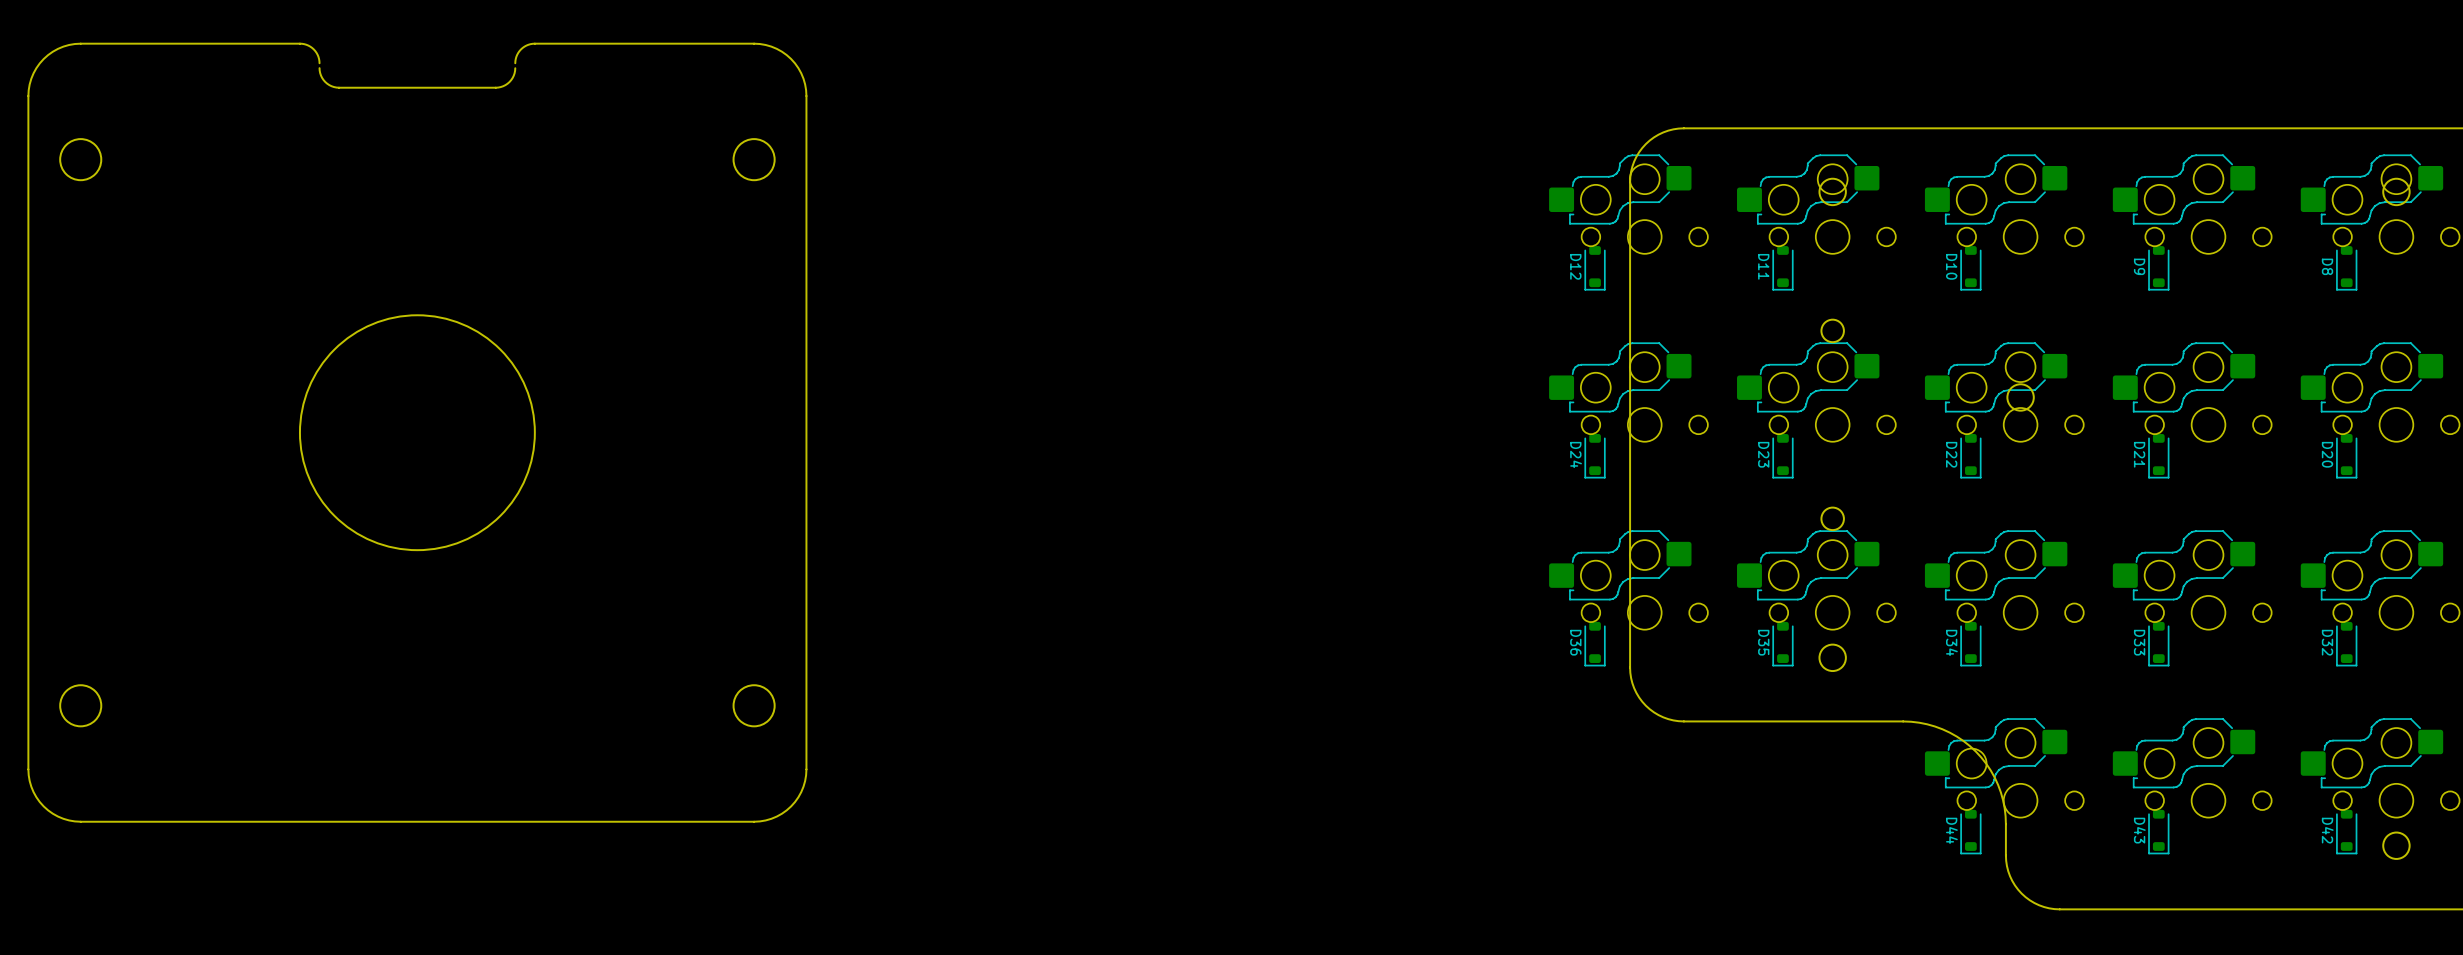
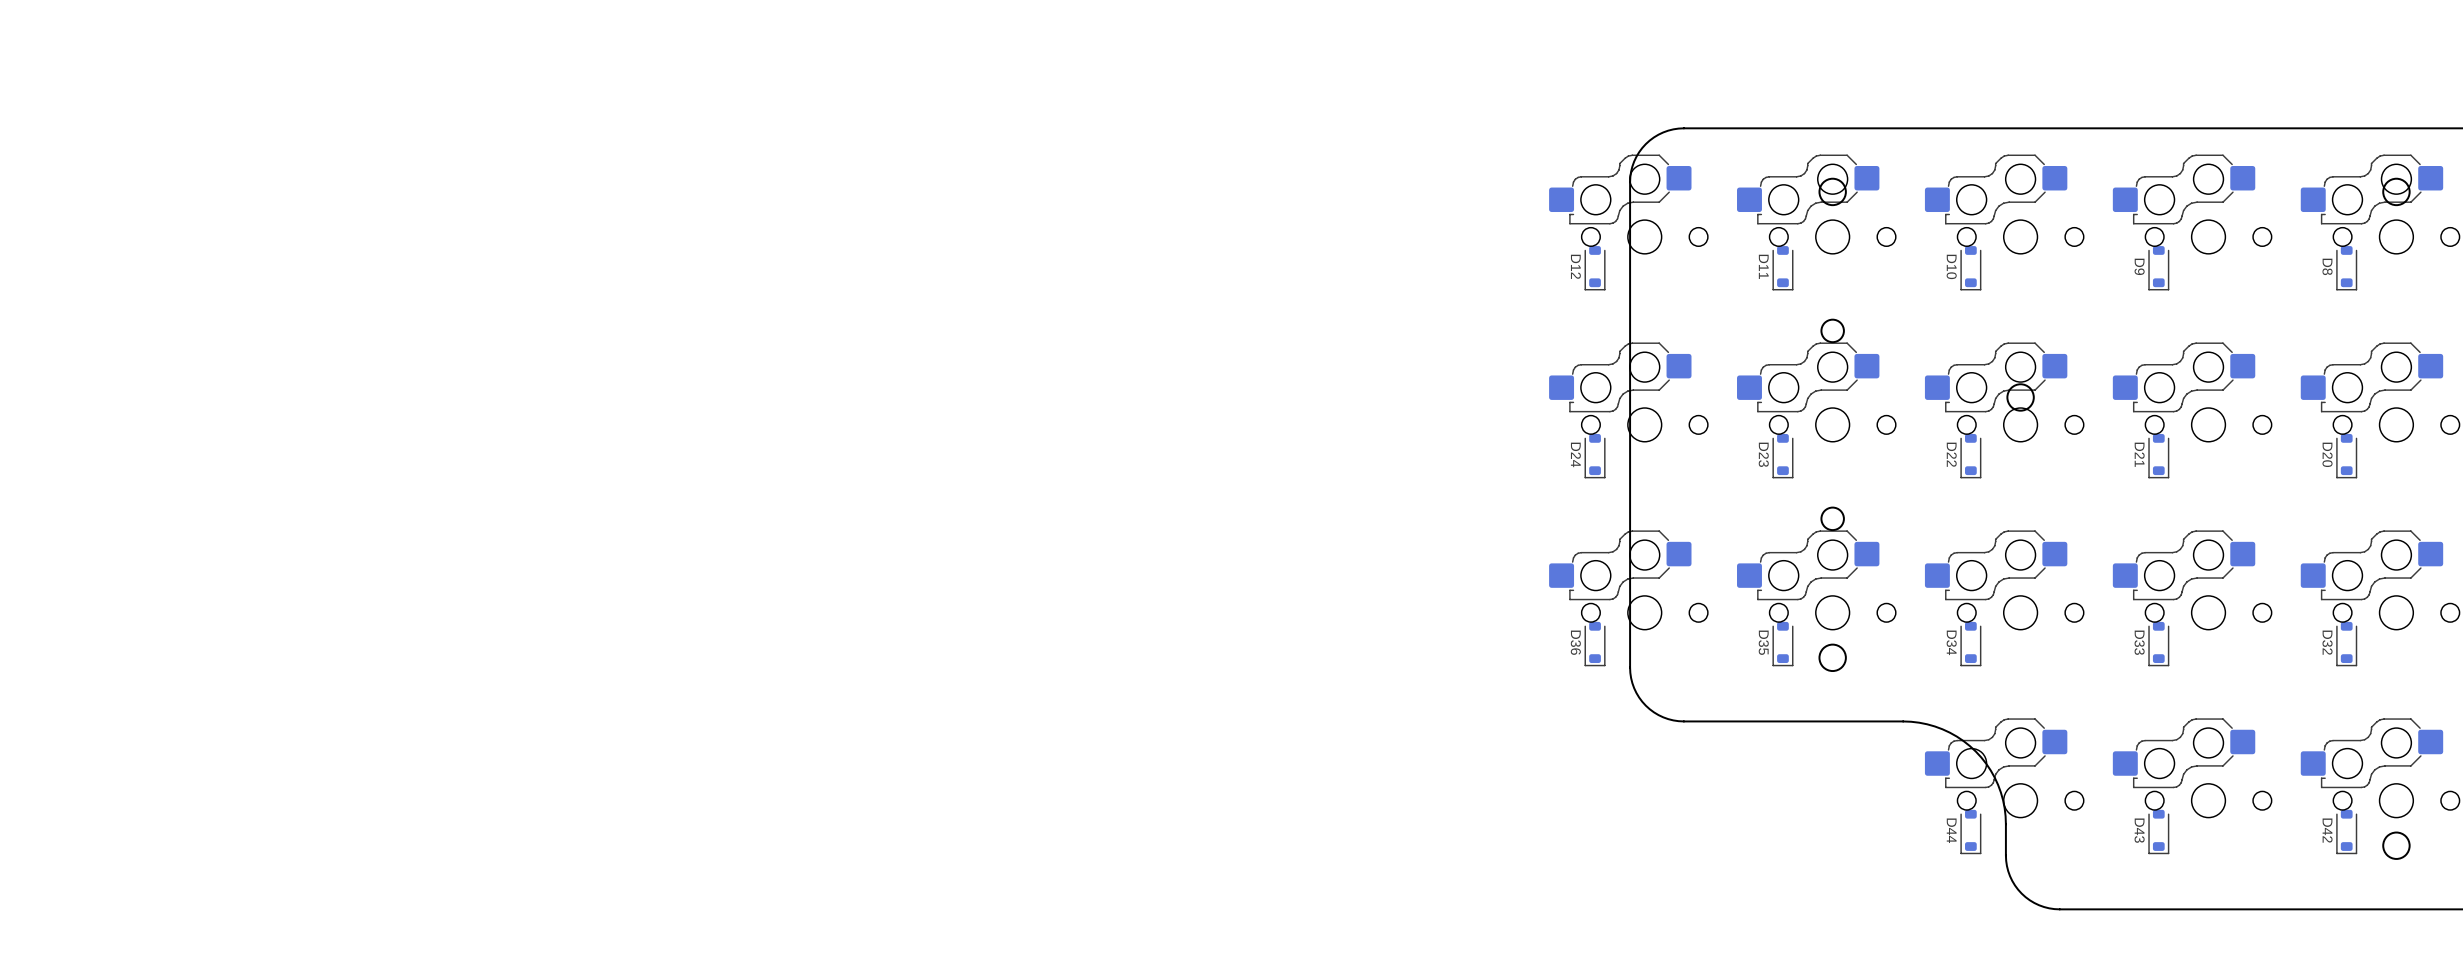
board edge: (515, 63) (519, 51) (532, 43) (754, 43) (771, 46) (786, 55) (795, 63) (803, 78) (806, 96) (806, 769) (803, 786) (798, 797) (786, 810) (776, 816) (754, 821) (80, 821) (63, 818) (48, 810) (39, 802) (31, 786) (28, 769) (28, 96) (31, 78) (36, 68) (48, 55) (63, 46) (80, 43) (302, 43) (313, 49) (319, 63) -> none
board edge: (319, 68) (325, 81) (339, 87) (498, 87) (509, 82) (515, 68) -> none
round board edge: [59, 138, 103, 182] -> none
round board edge: [732, 138, 776, 182] -> none
round board edge: [298, 314, 536, 552] -> none
round board edge: [59, 684, 103, 728] -> none
round board edge: [732, 684, 776, 728] -> none

